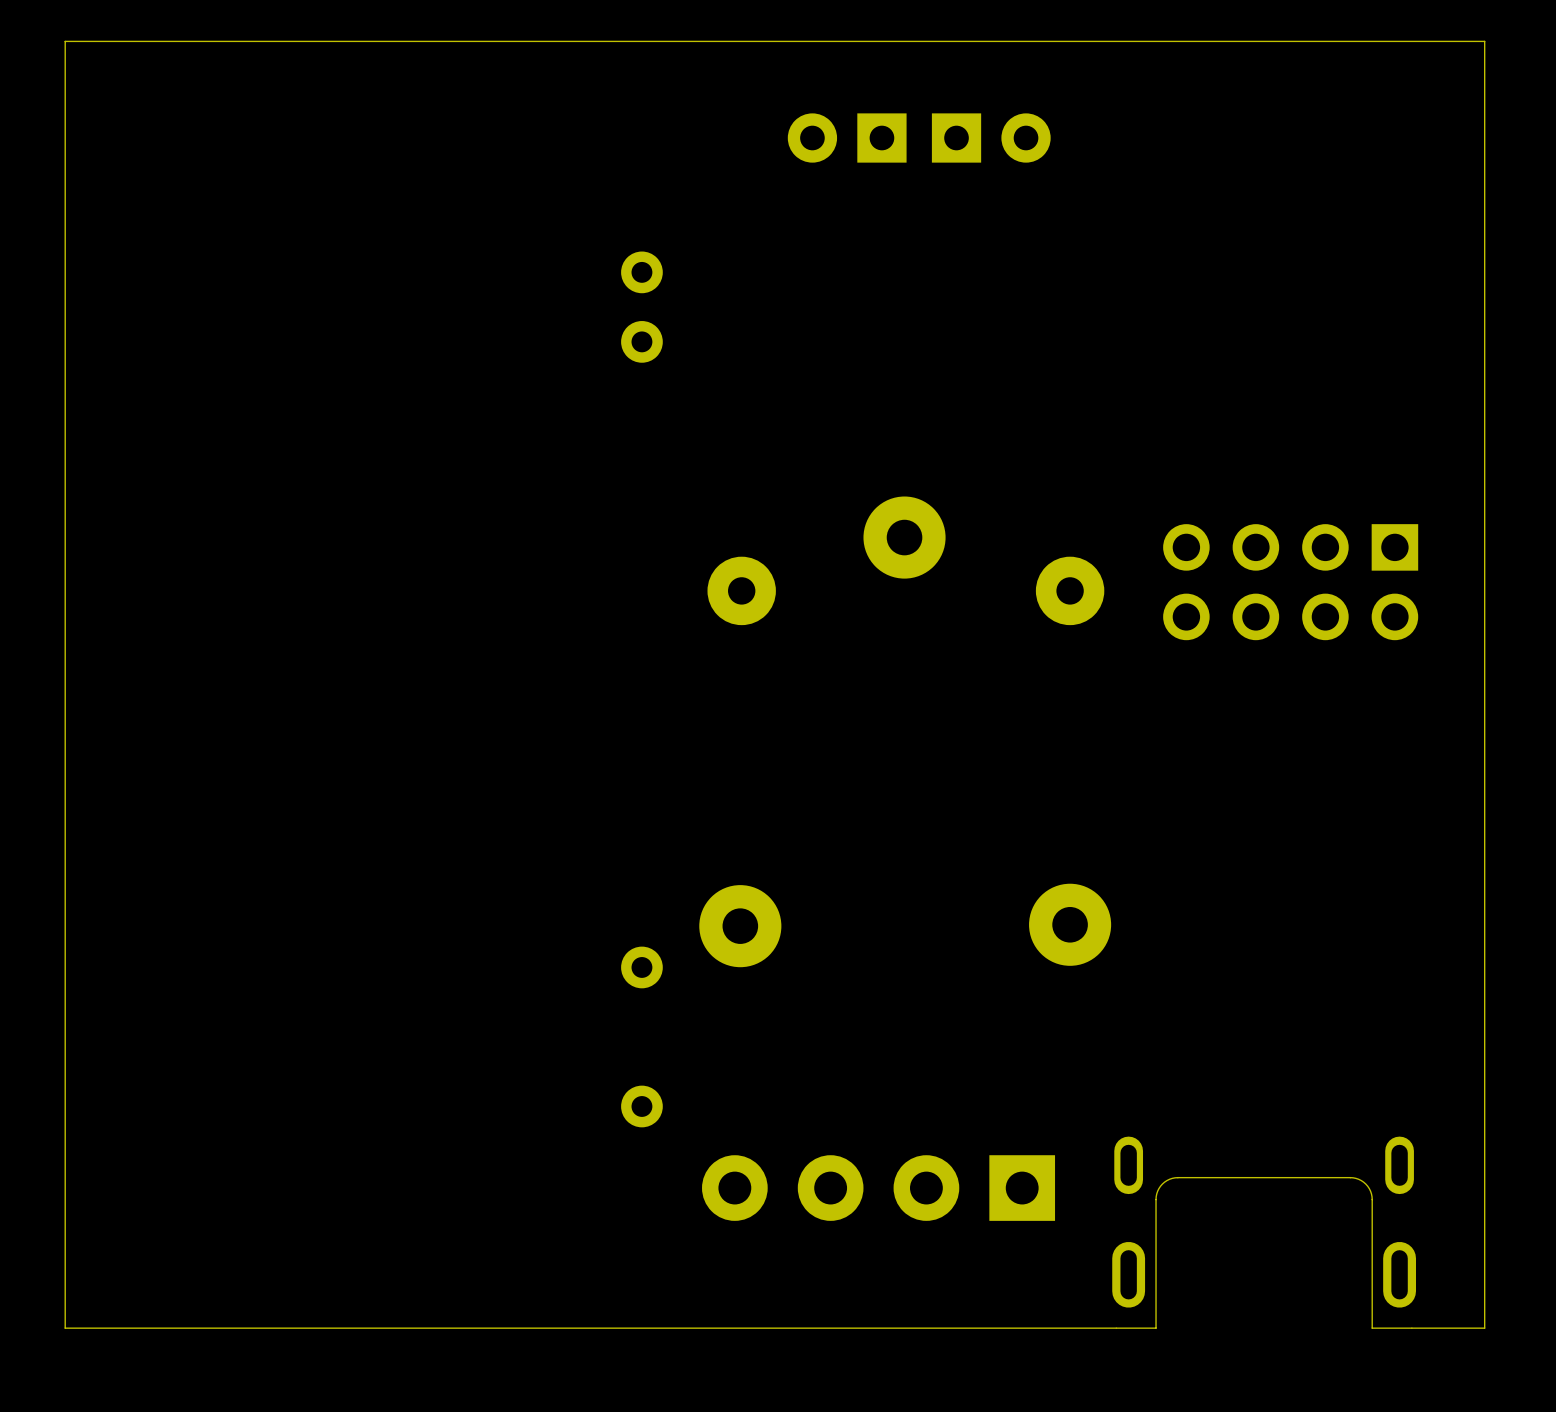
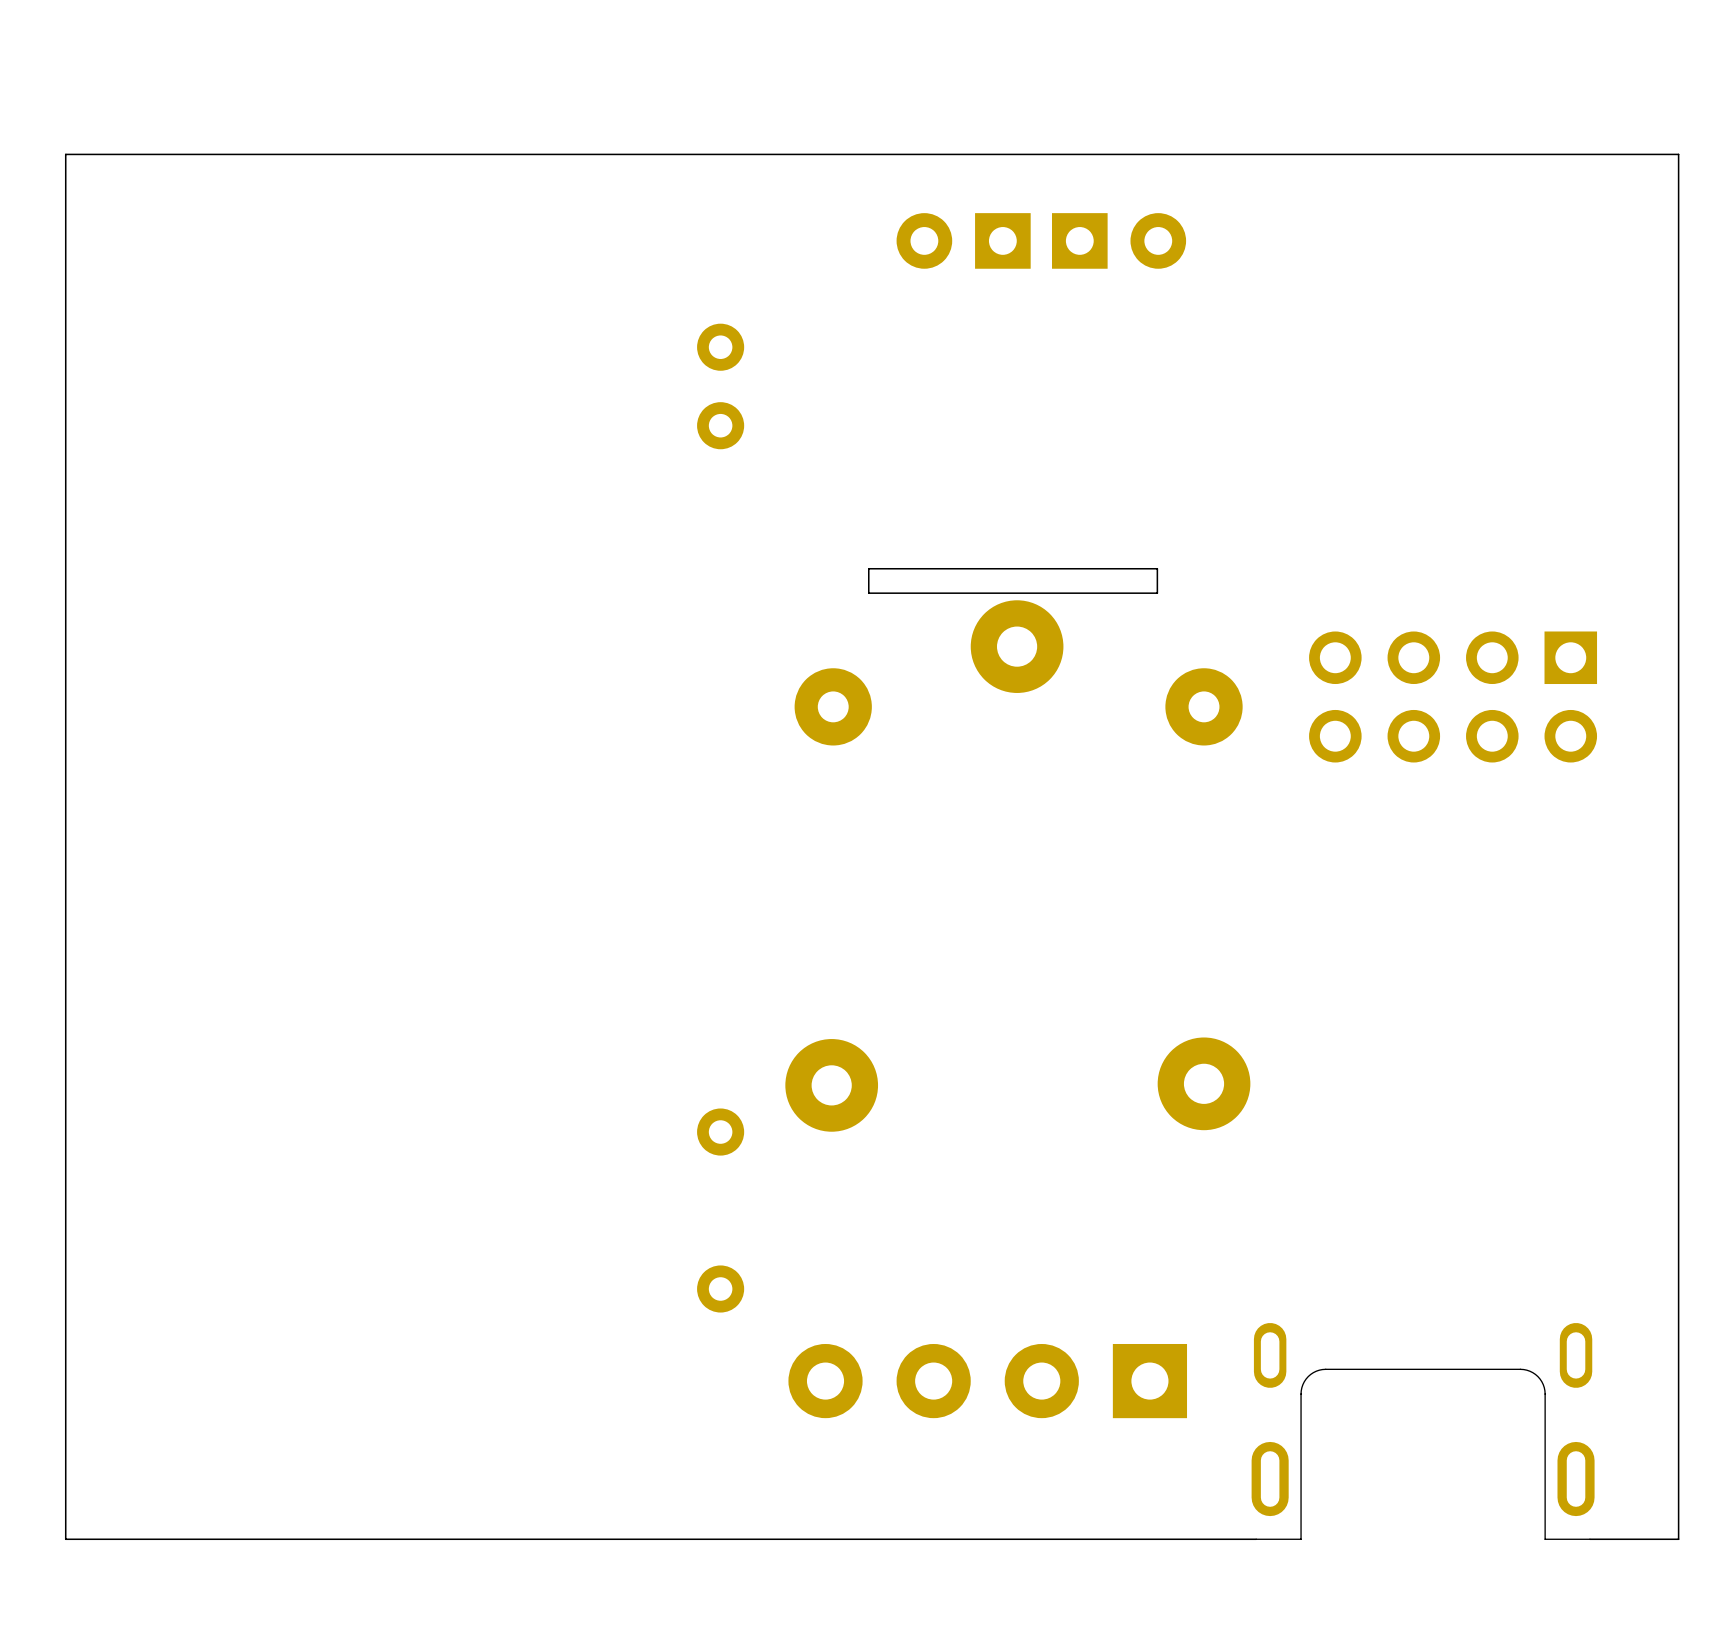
part position: (847, 138) -> (963, 240)
part position: (991, 138) -> (1119, 240)
board edge: none -> (1157, 568) (868, 568) (868, 593) (1157, 593) (1157, 568)
board edge: (1484, 1328) (1484, 41) (65, 41) (65, 1328) -> (1672, 1539) (1678, 1539) (1678, 154) (65, 154) (65, 1539) (69, 1539)

